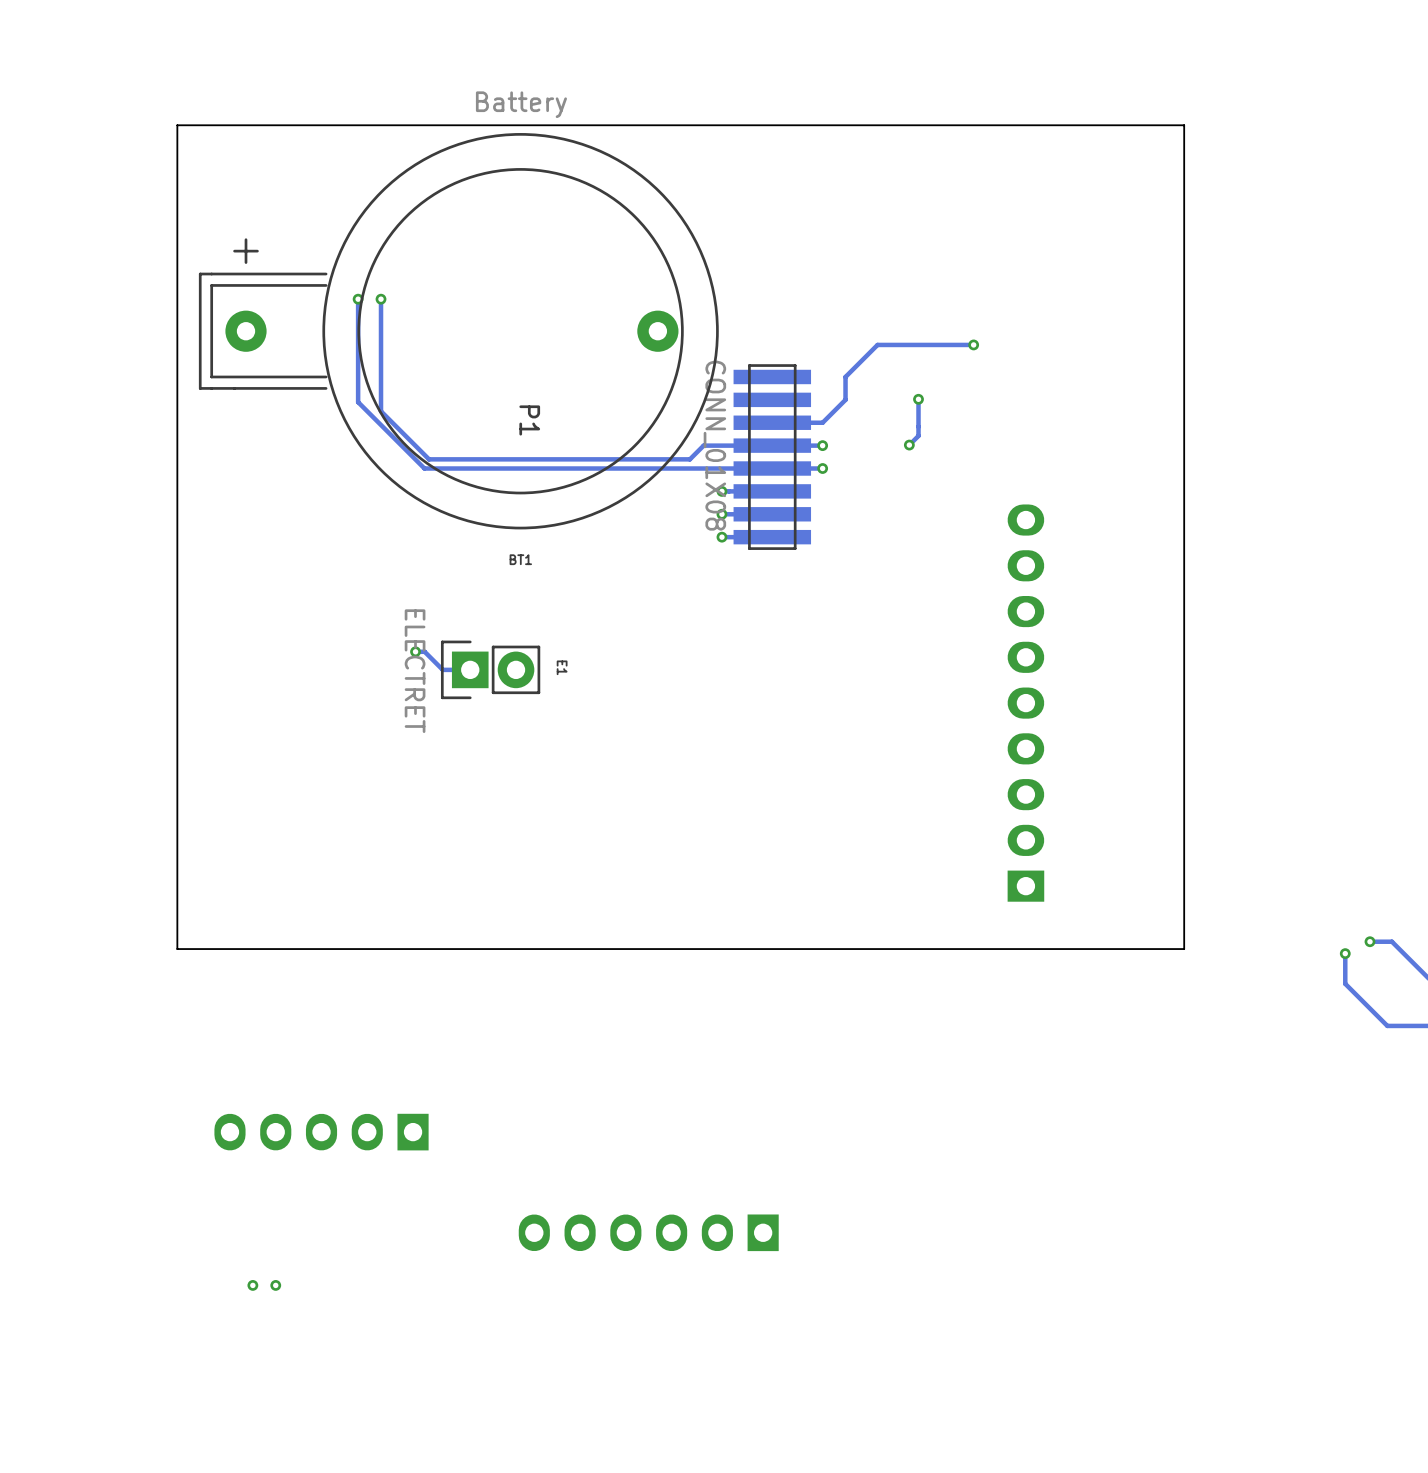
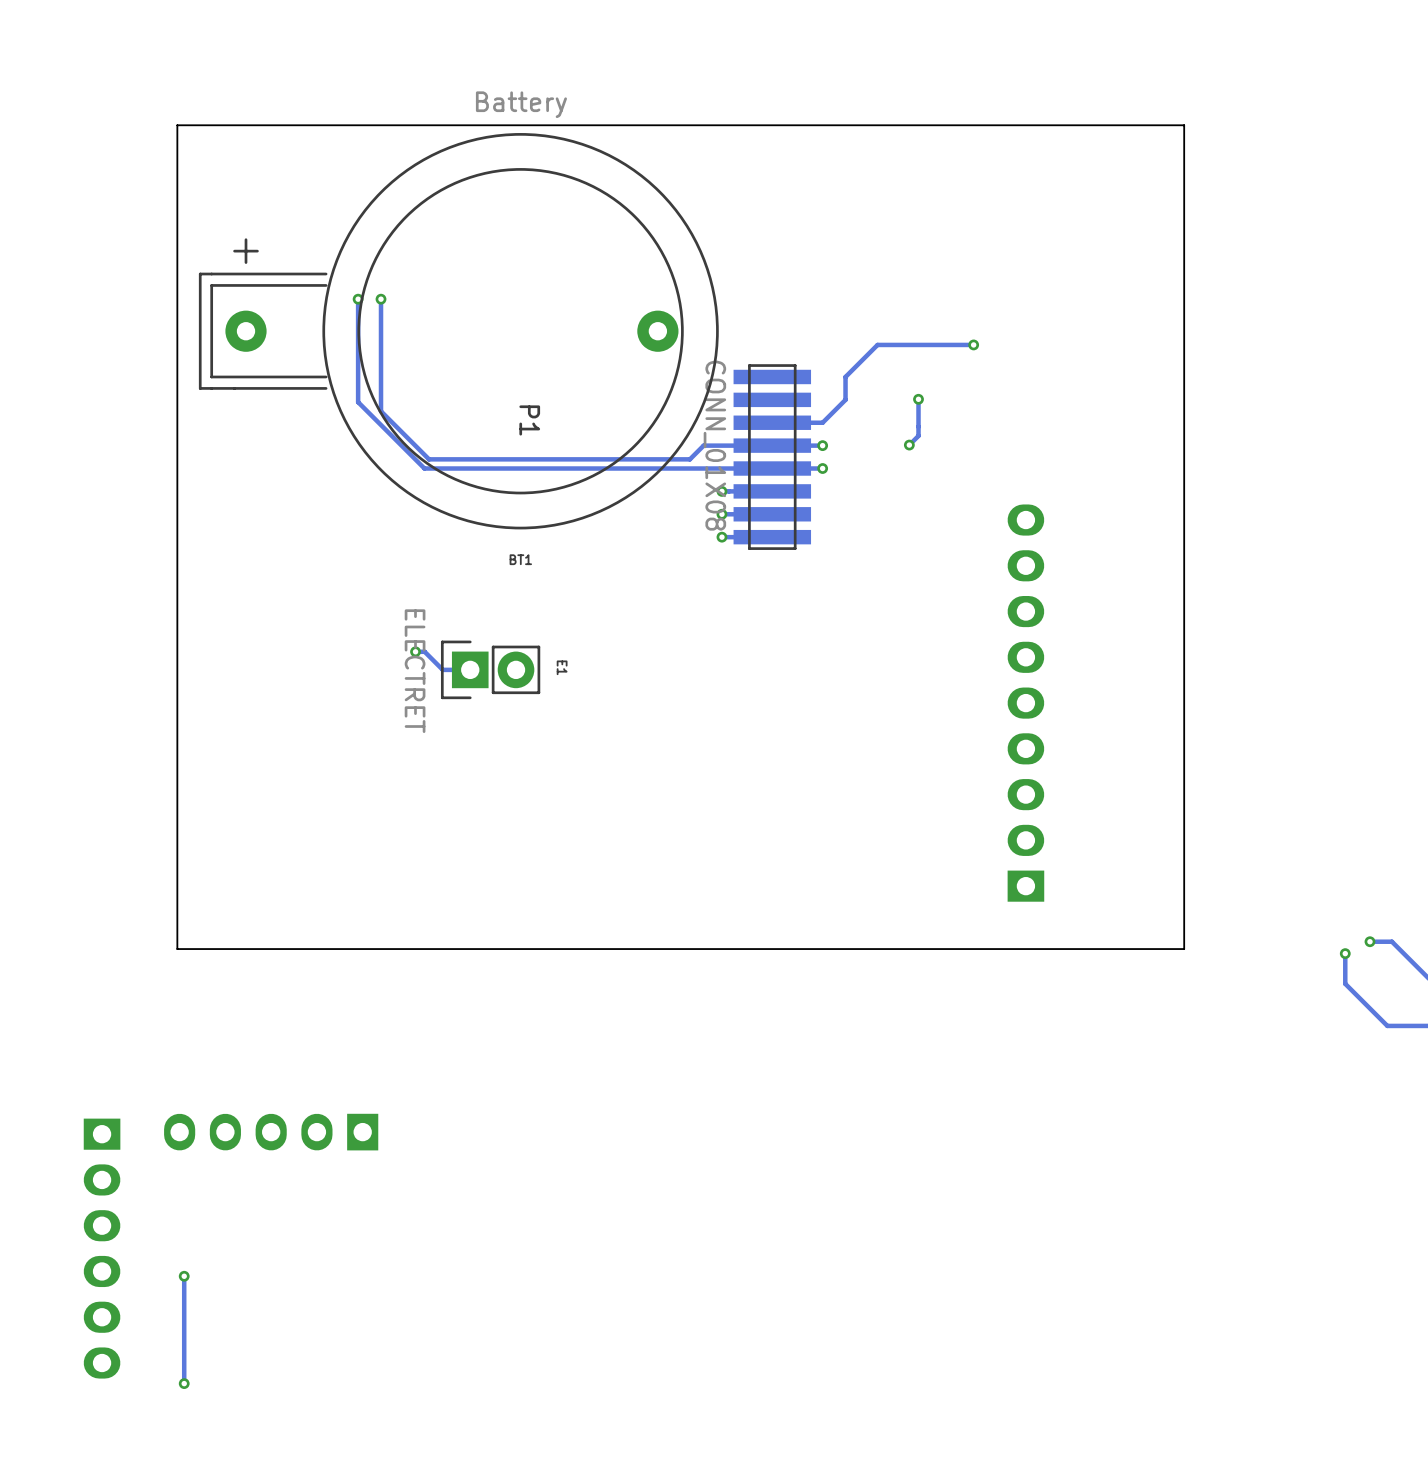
part position: (321, 1132) -> (271, 1132)
part: (648, 1232) -> none
part: none -> (102, 1248)
track: none -> (184, 1276) (184, 1383)
via: none -> (184, 1276)
via: (252, 1285) -> none
via: (275, 1285) -> none
via: none -> (184, 1383)

